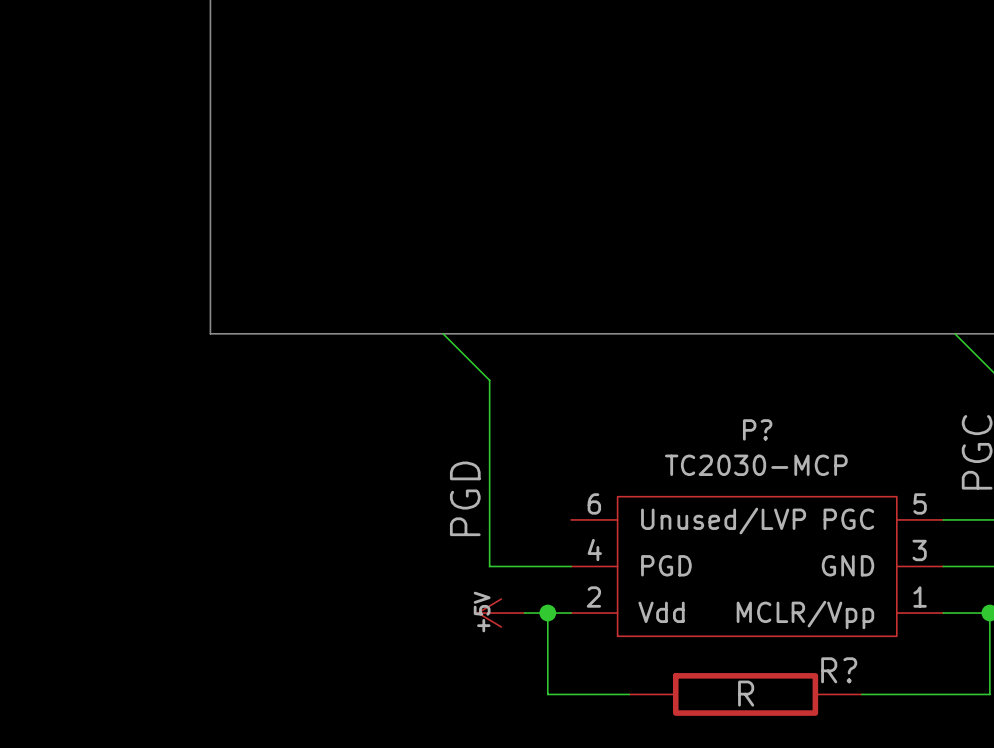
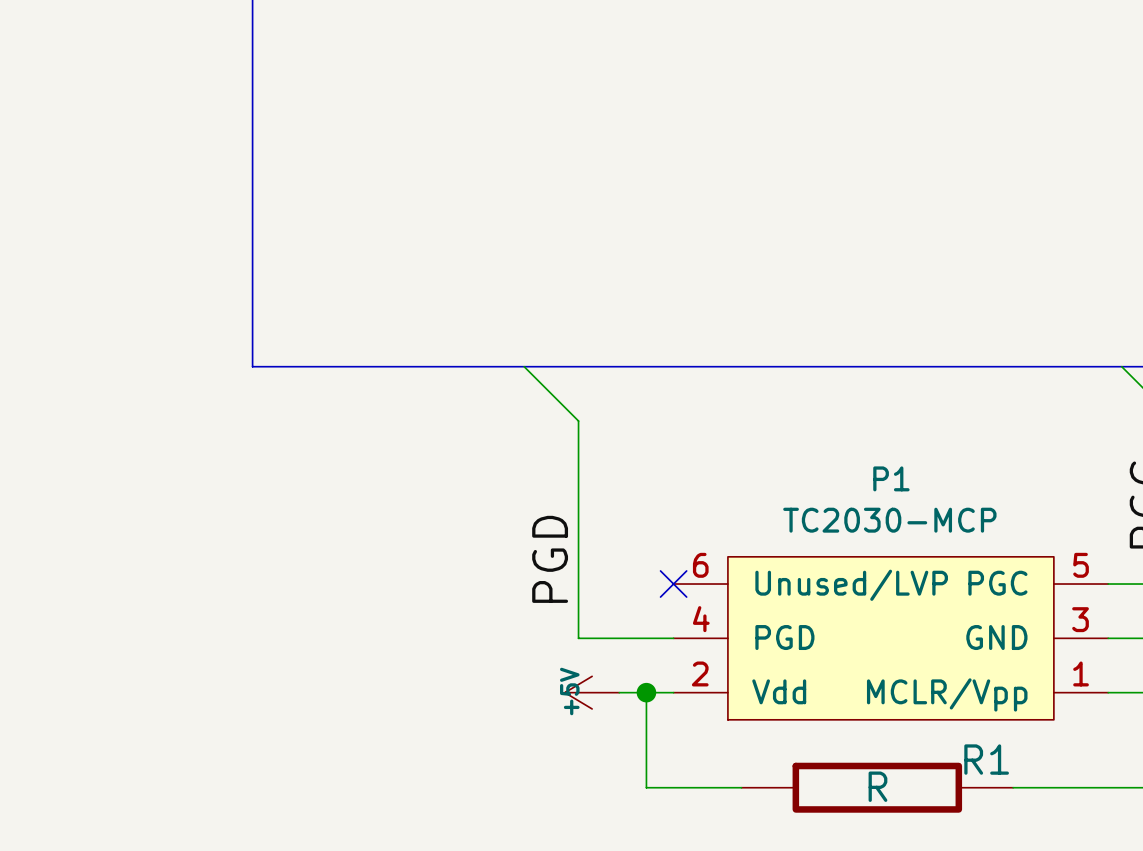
P? name: P? (757, 429) -> P1 (891, 478)
no-connect mark: none -> (673, 584)
R? name: R? (839, 670) -> R1 (986, 759)

